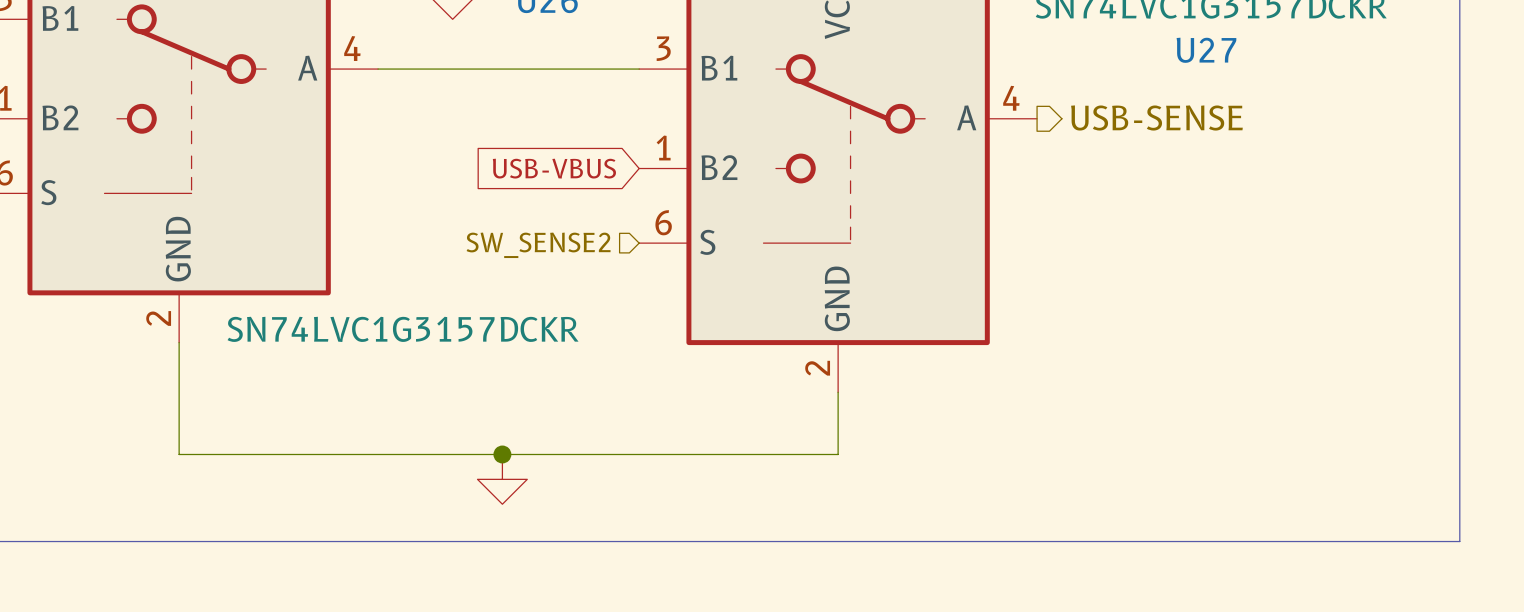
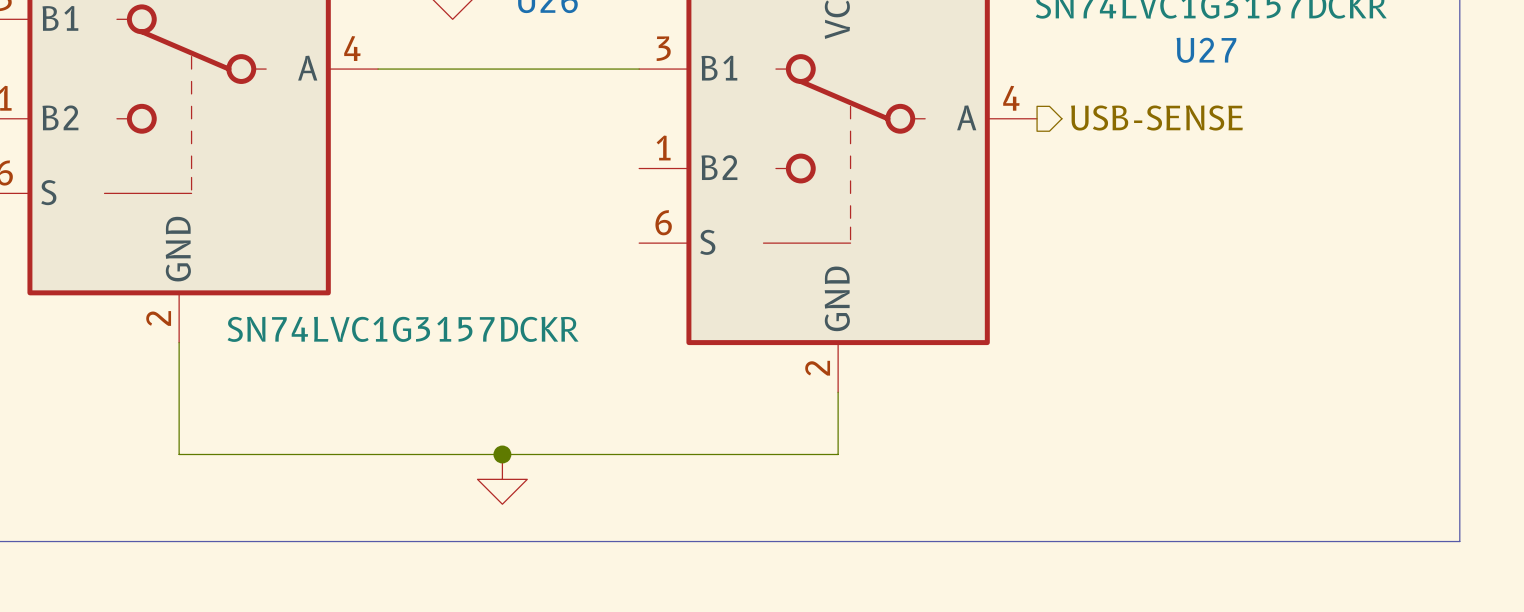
global label: USB-VBUS (554, 168) -> none
hierarchical label: SW_SENSE2 (538, 245) -> none

